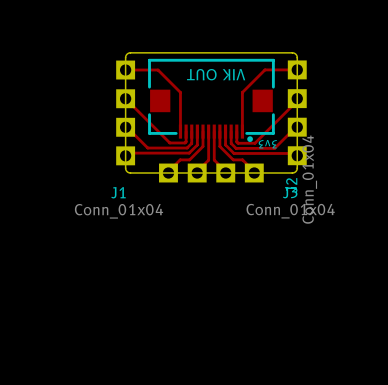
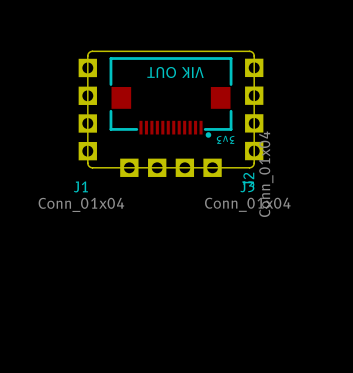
top track: (295, 69) (264, 69) (242, 92) (242, 131) -> none
top track: (127, 70) (158, 70) (180, 92) (180, 131) -> none
top track: (127, 98) (169, 142) (185, 142) (186, 131) -> none
top track: (295, 98) (295, 102) (254, 143) (238, 143) (236, 131) -> none
top track: (127, 127) (147, 148) (187, 148) (191, 143) (191, 131) -> none
top track: (295, 127) (274, 148) (236, 148) (231, 143) (231, 131) -> none
top track: (197, 131) (197, 144) (189, 153) (128, 153) (127, 155) -> none
top track: (203, 131) (203, 146) (189, 159) (180, 159) (168, 171) -> none
top track: (208, 131) (208, 160) (197, 171) -> none
top track: (214, 131) (214, 160) (225, 171) -> none
top track: (219, 131) (219, 146) (233, 159) (242, 159) (254, 171) -> none
top track: (225, 131) (225, 144) (234, 153) (295, 153) (295, 155) -> none

